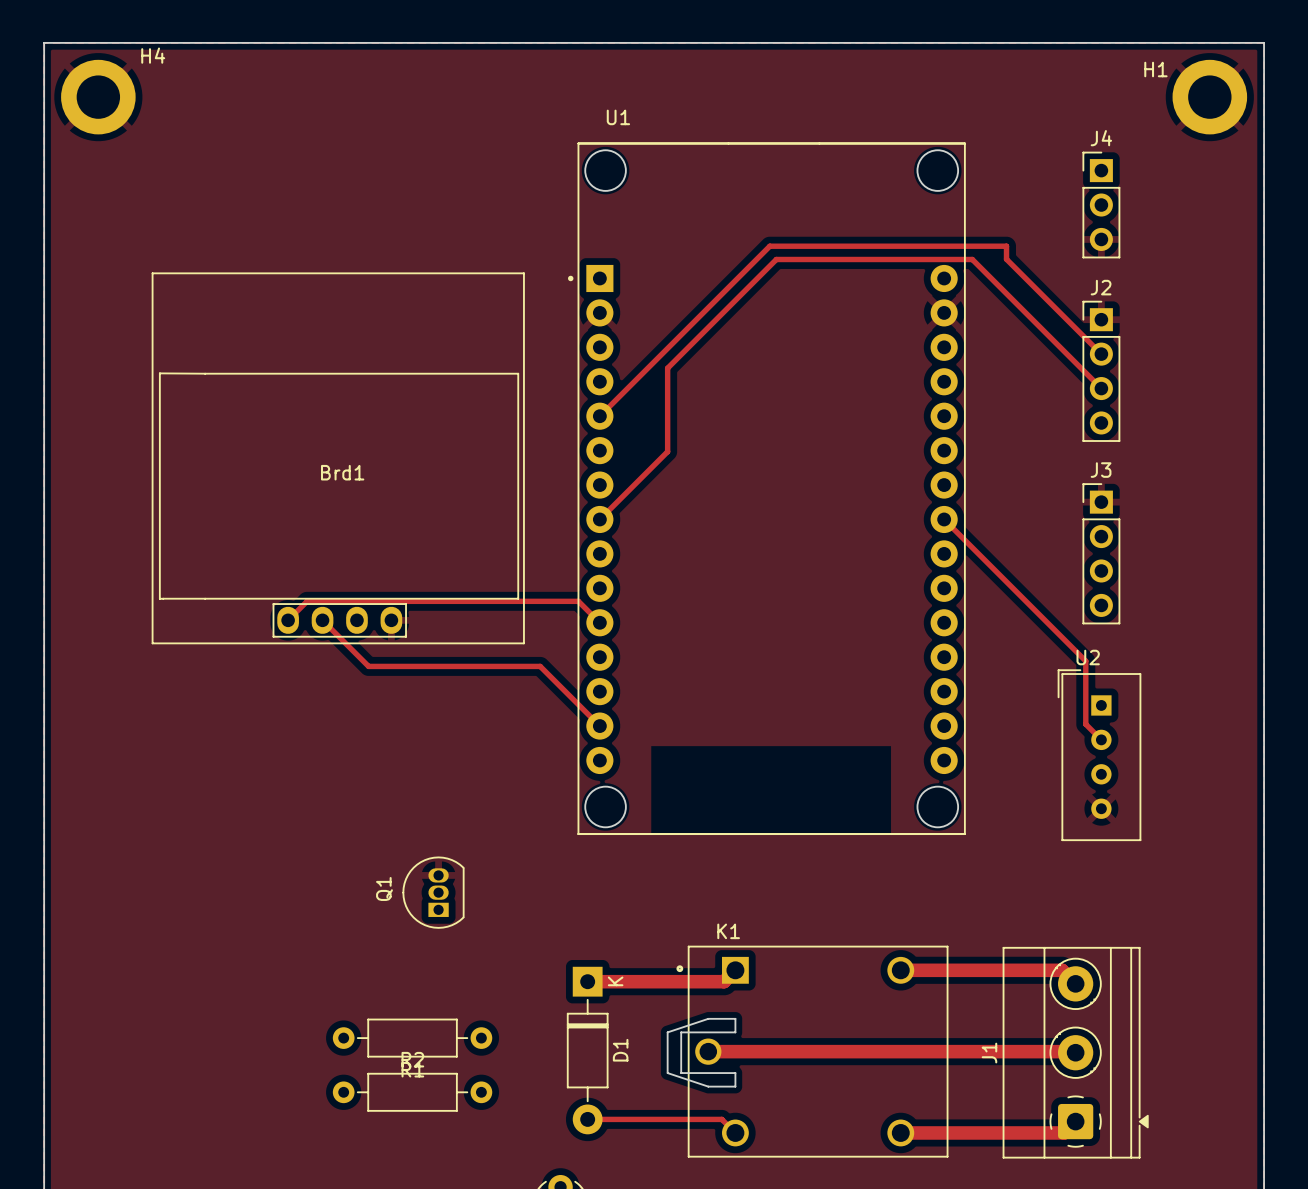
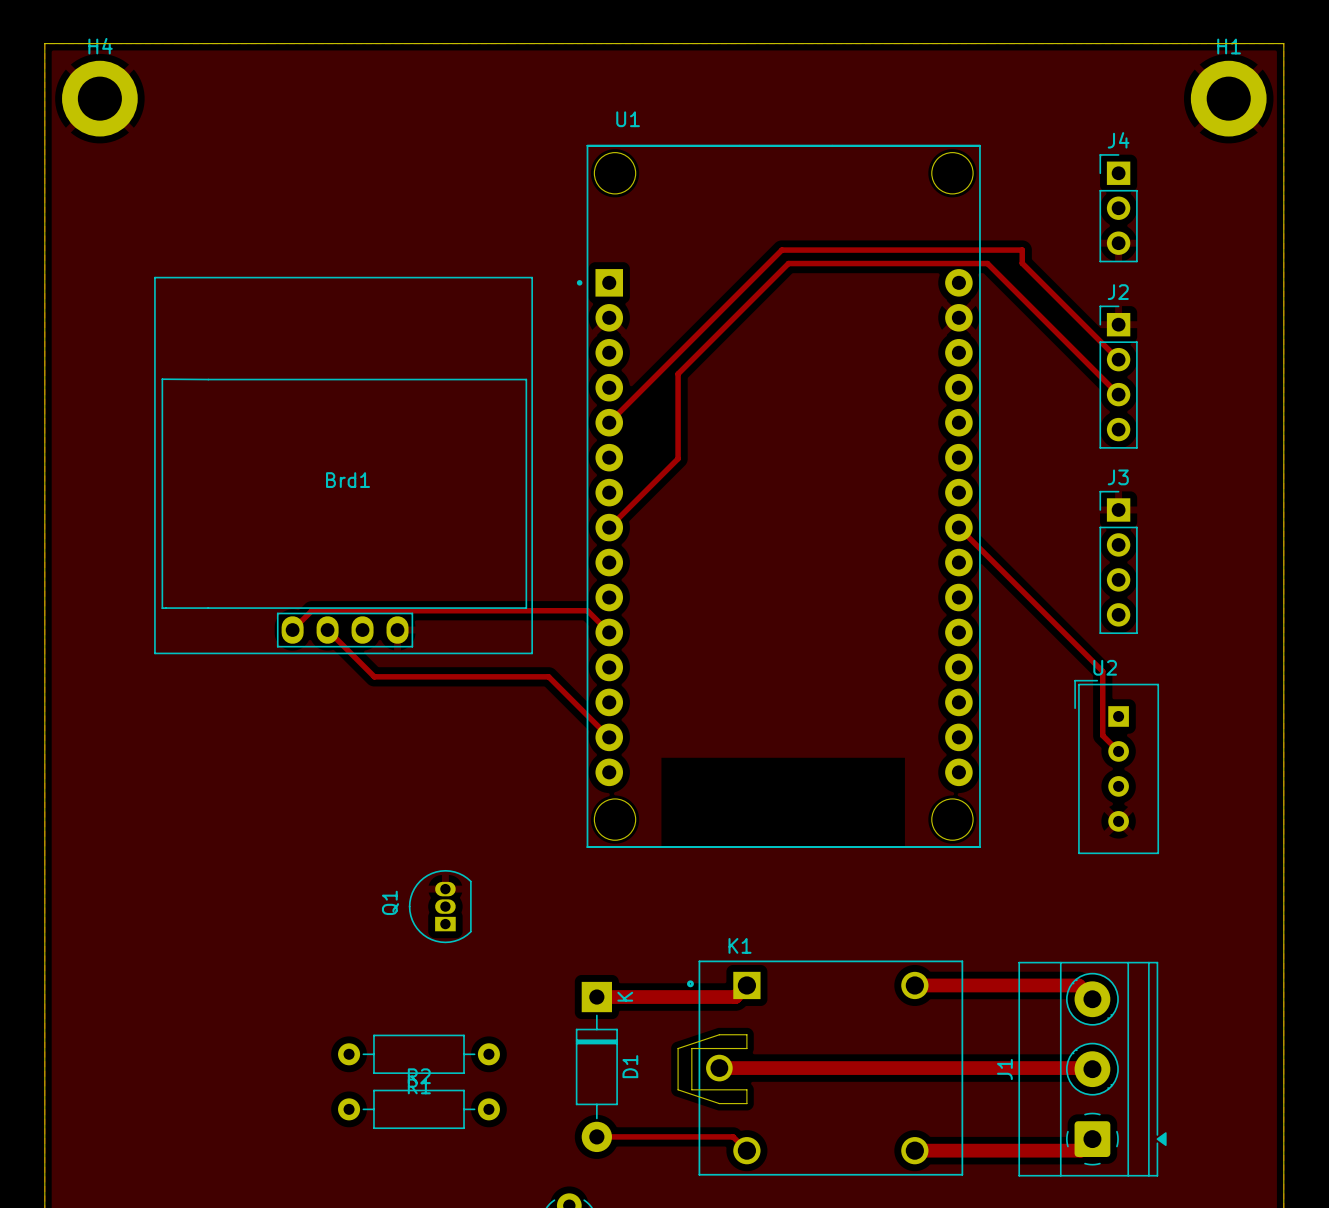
H4 name position: H4 (153, 55) -> H4 (100, 46)
H1 name position: H1 (1155, 69) -> H1 (1229, 46)

